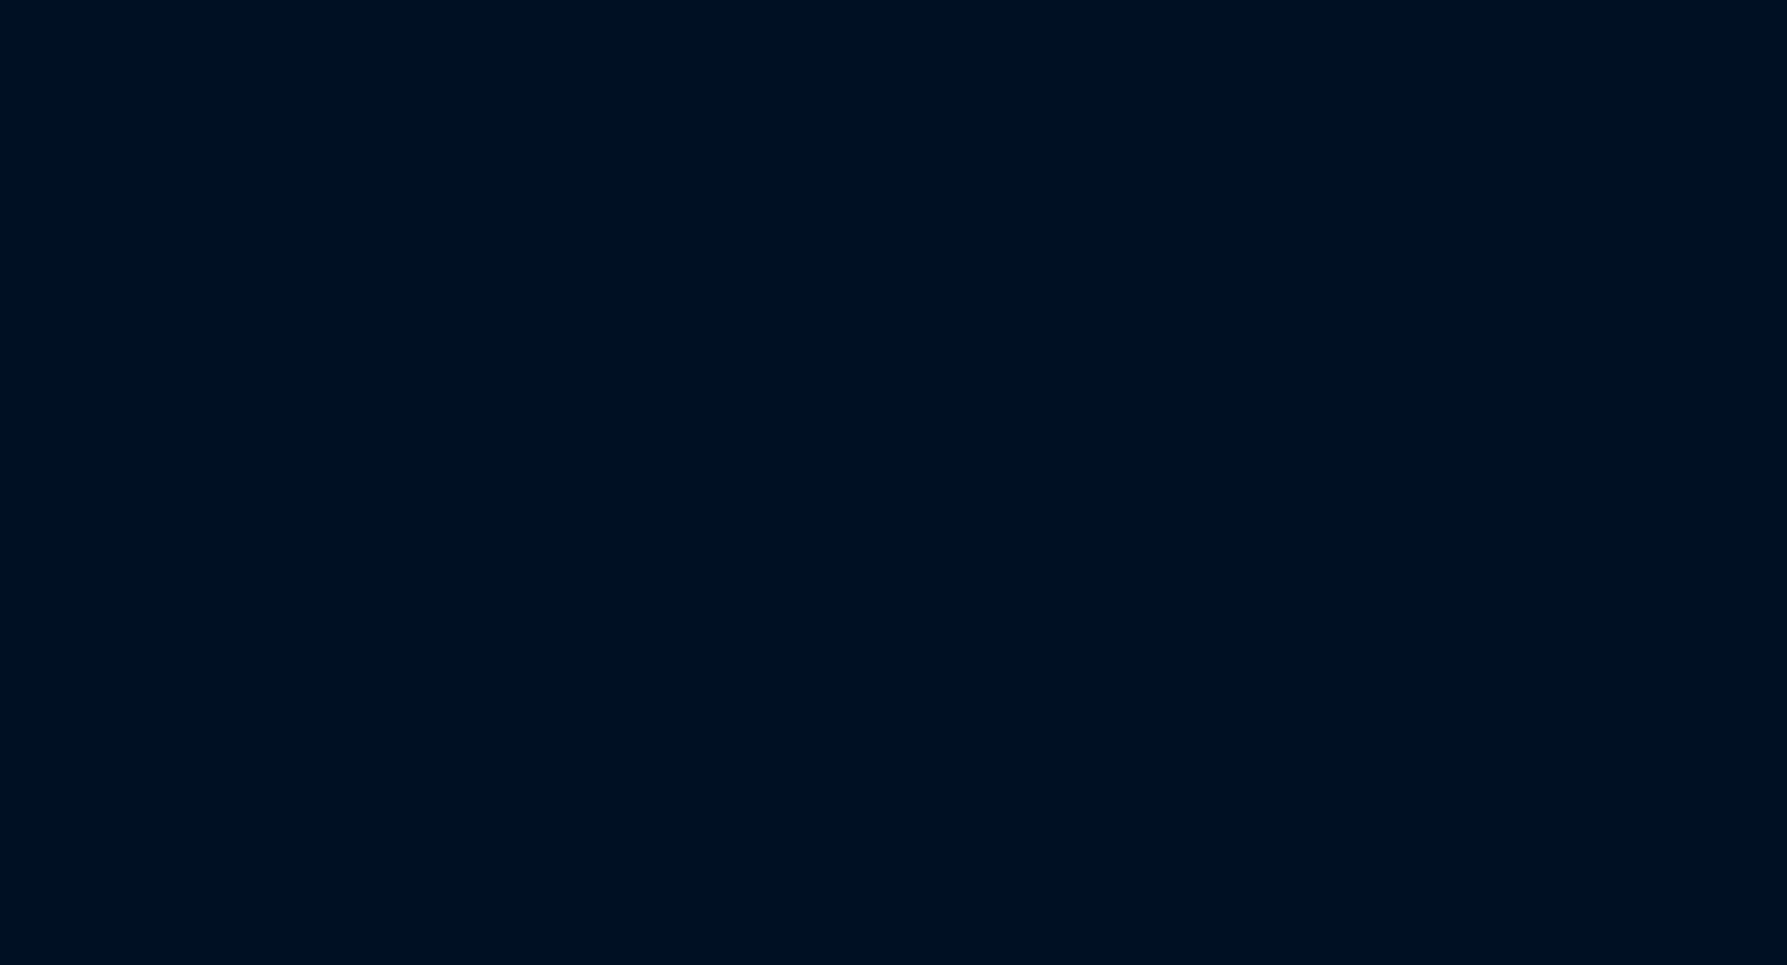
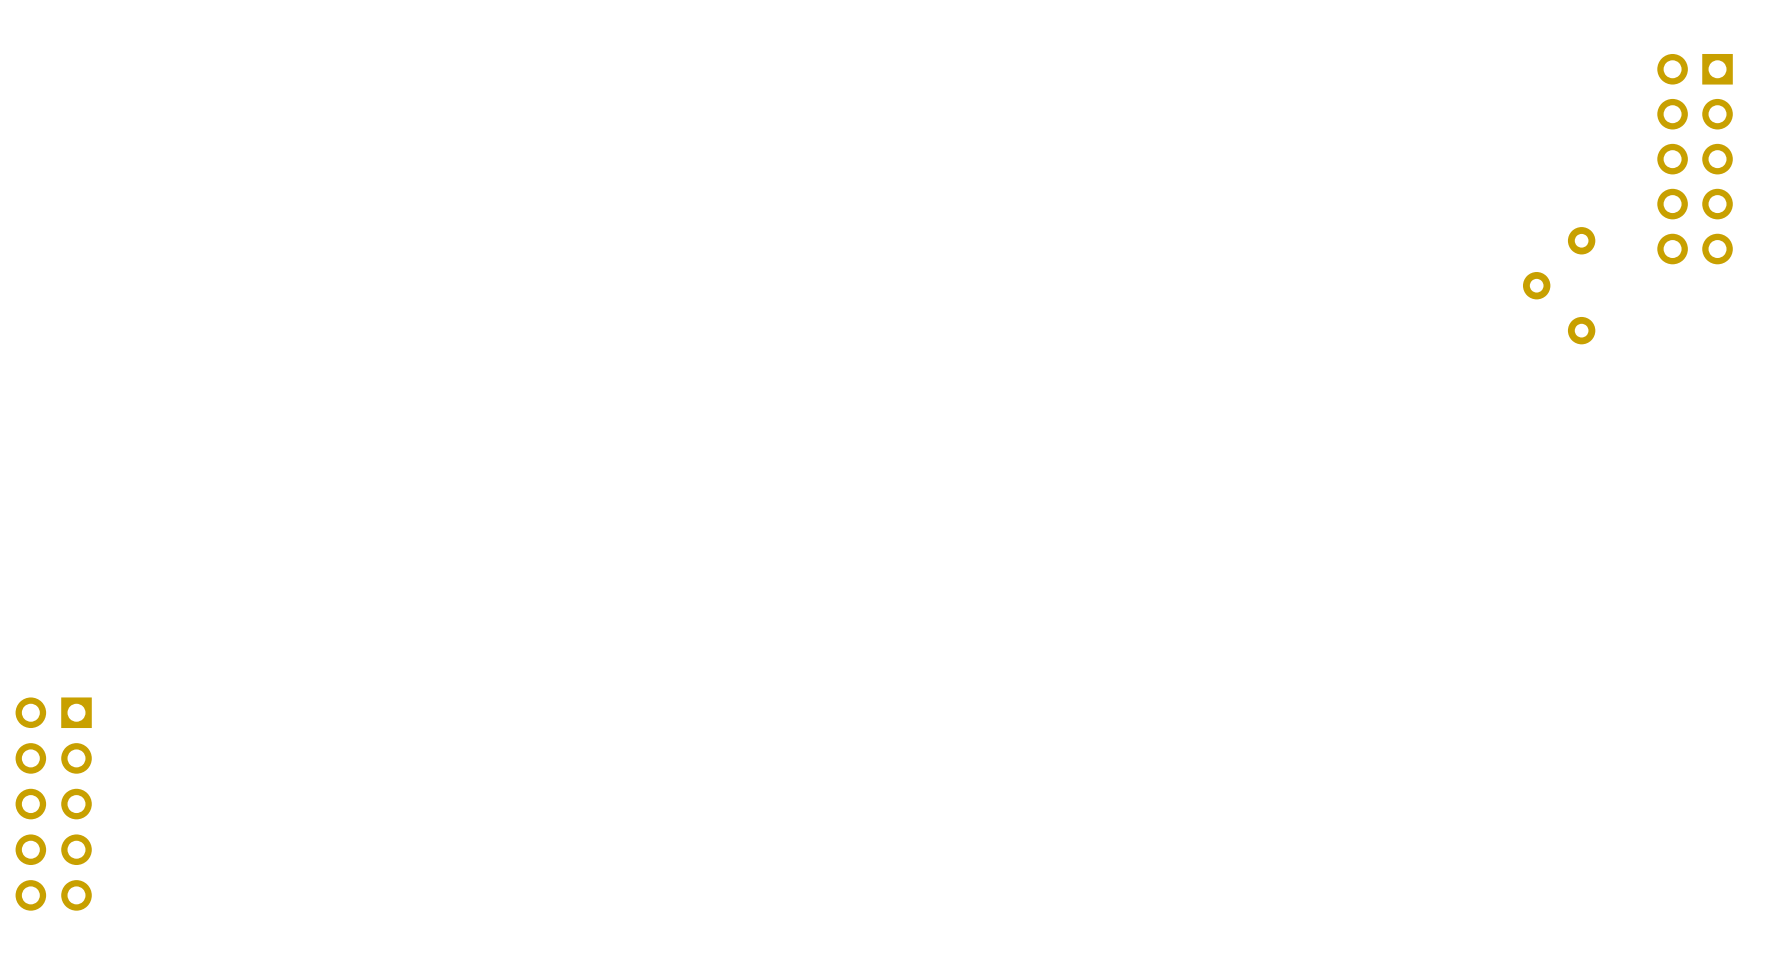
part: none -> (1695, 159)
part: none -> (1559, 285)
part: none -> (53, 804)

